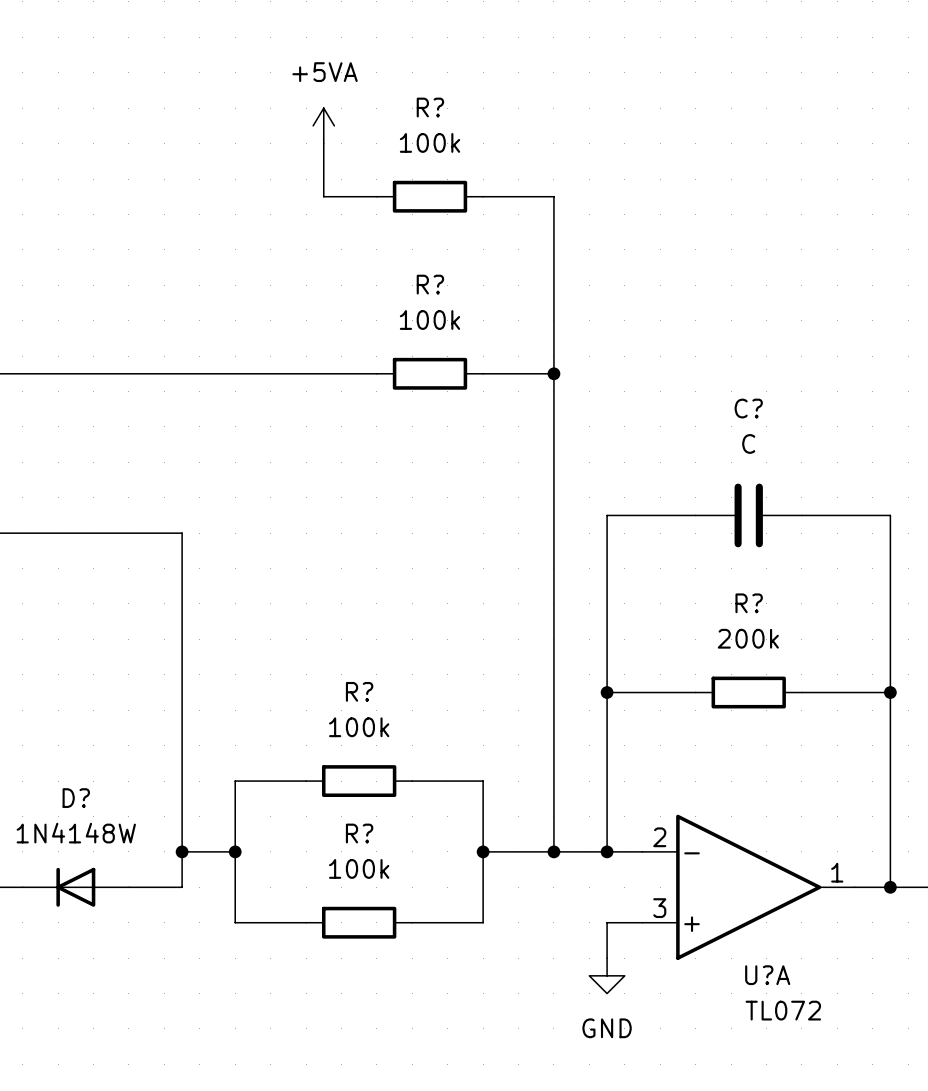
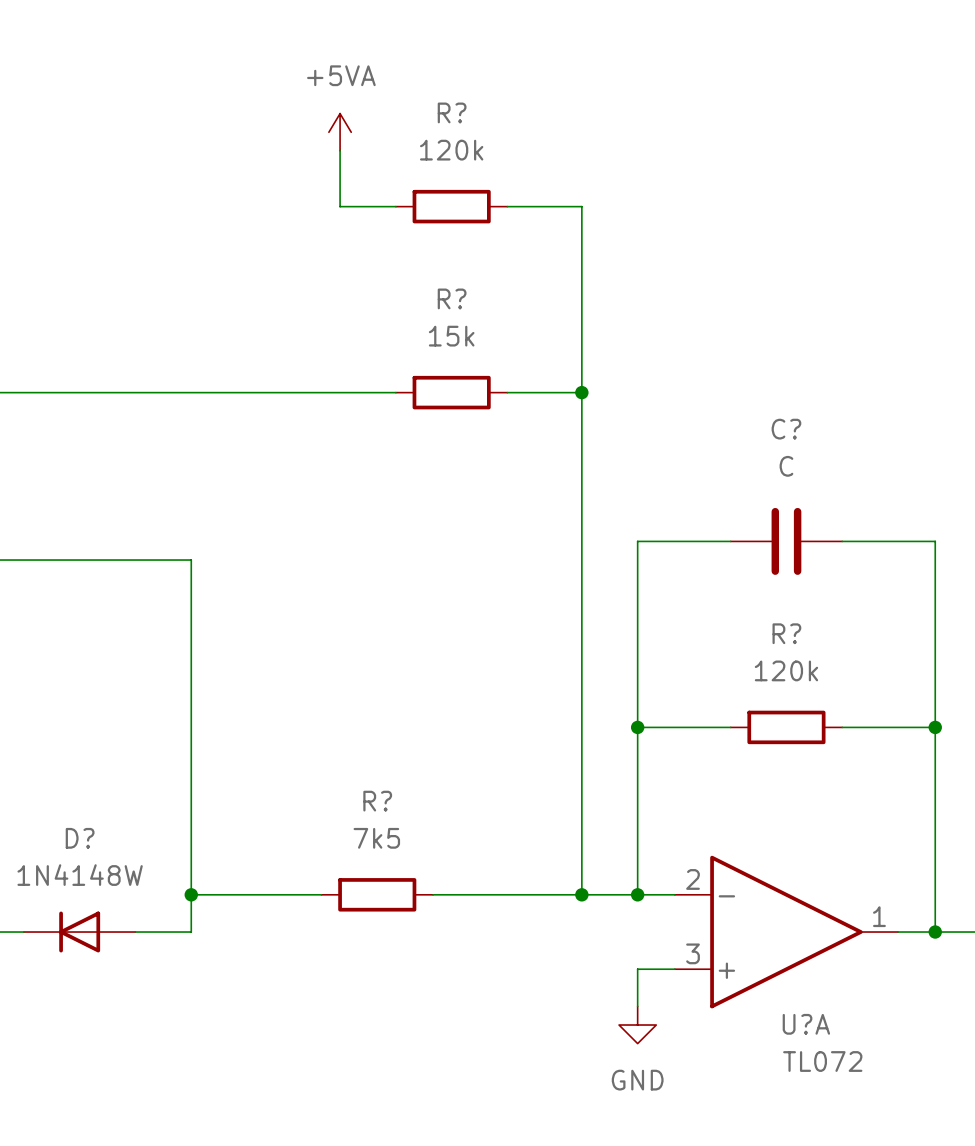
R? value: 100k (430, 142) -> 120k (451, 150)
R? value: 100k (430, 320) -> 15k (451, 336)
R? value: 200k (748, 638) -> 120k (786, 670)
wire: (306, 781) (235, 781) (235, 922) (306, 922) -> none
R?: 100k (359, 781) -> none
wire: (412, 781) (483, 781) (483, 922) (412, 922) -> none
wire: none -> (247, 894) (321, 894)
junction: (235, 851) -> none
R?: none -> 7k5 (377, 894)
wire: none -> (433, 894) (507, 894)
junction: (483, 851) -> none
R?: 100k (359, 922) -> none

